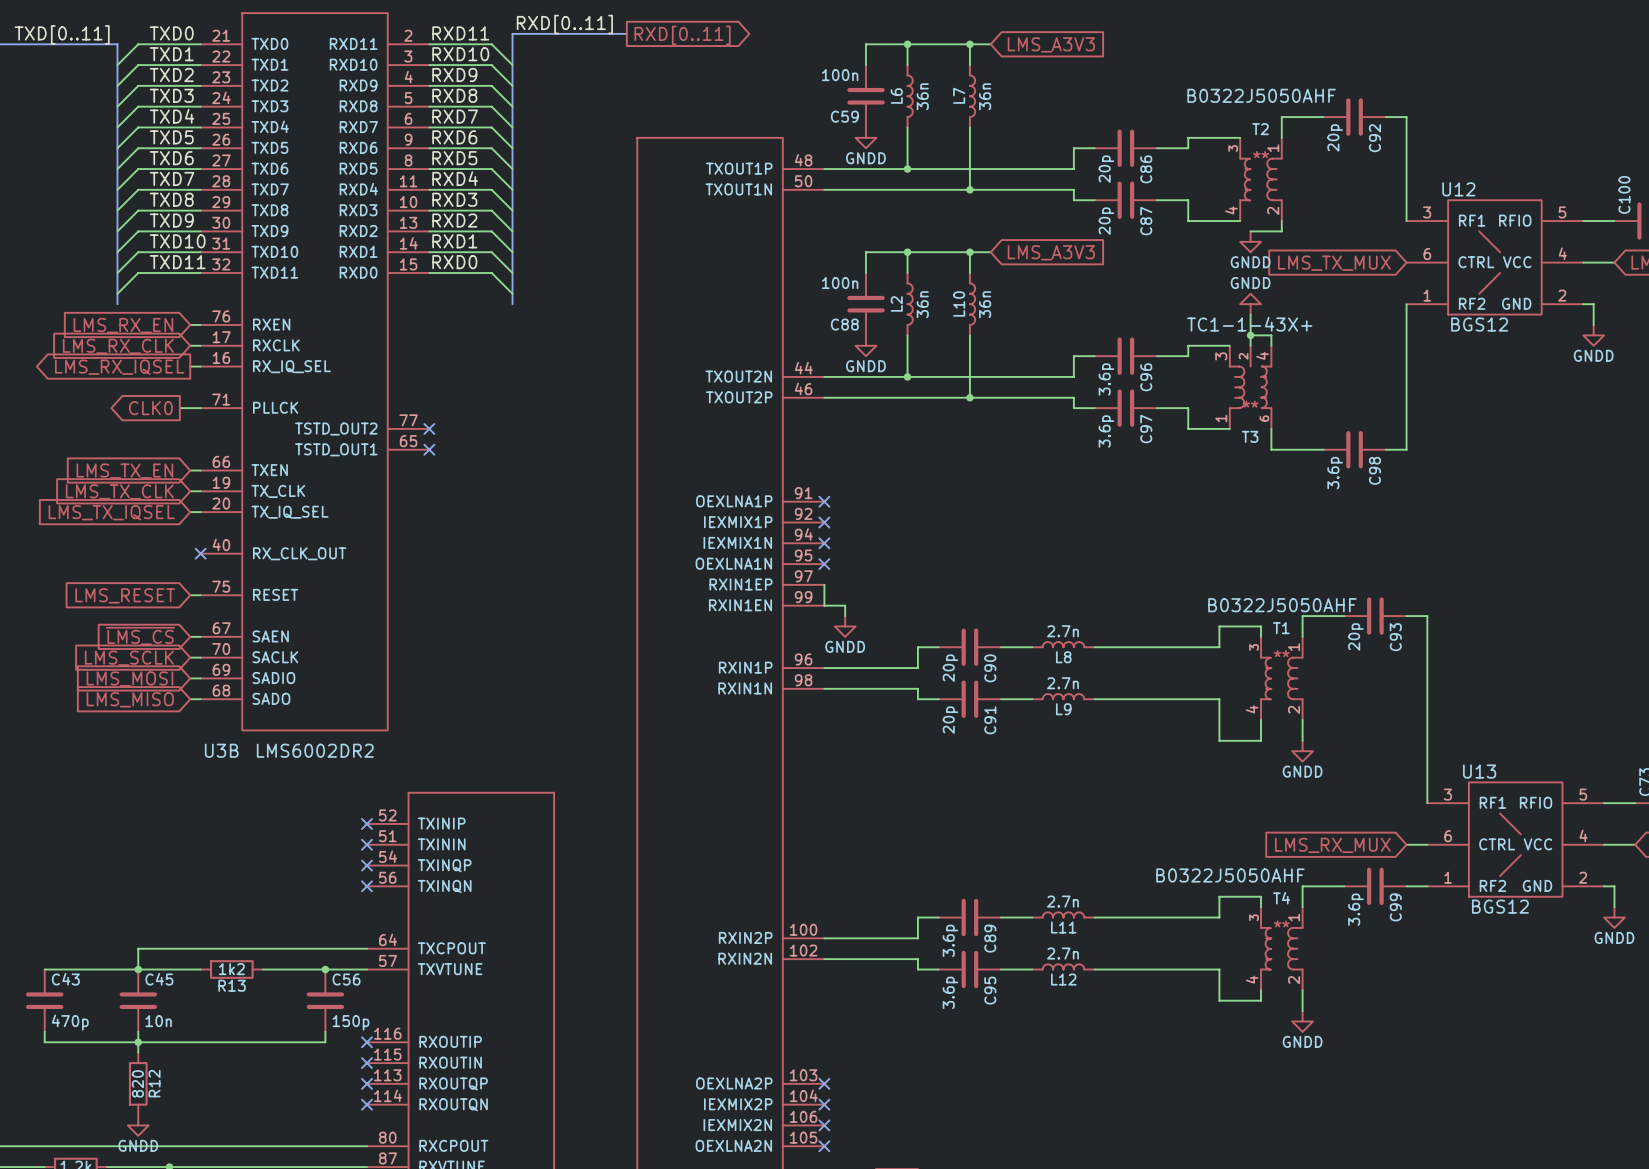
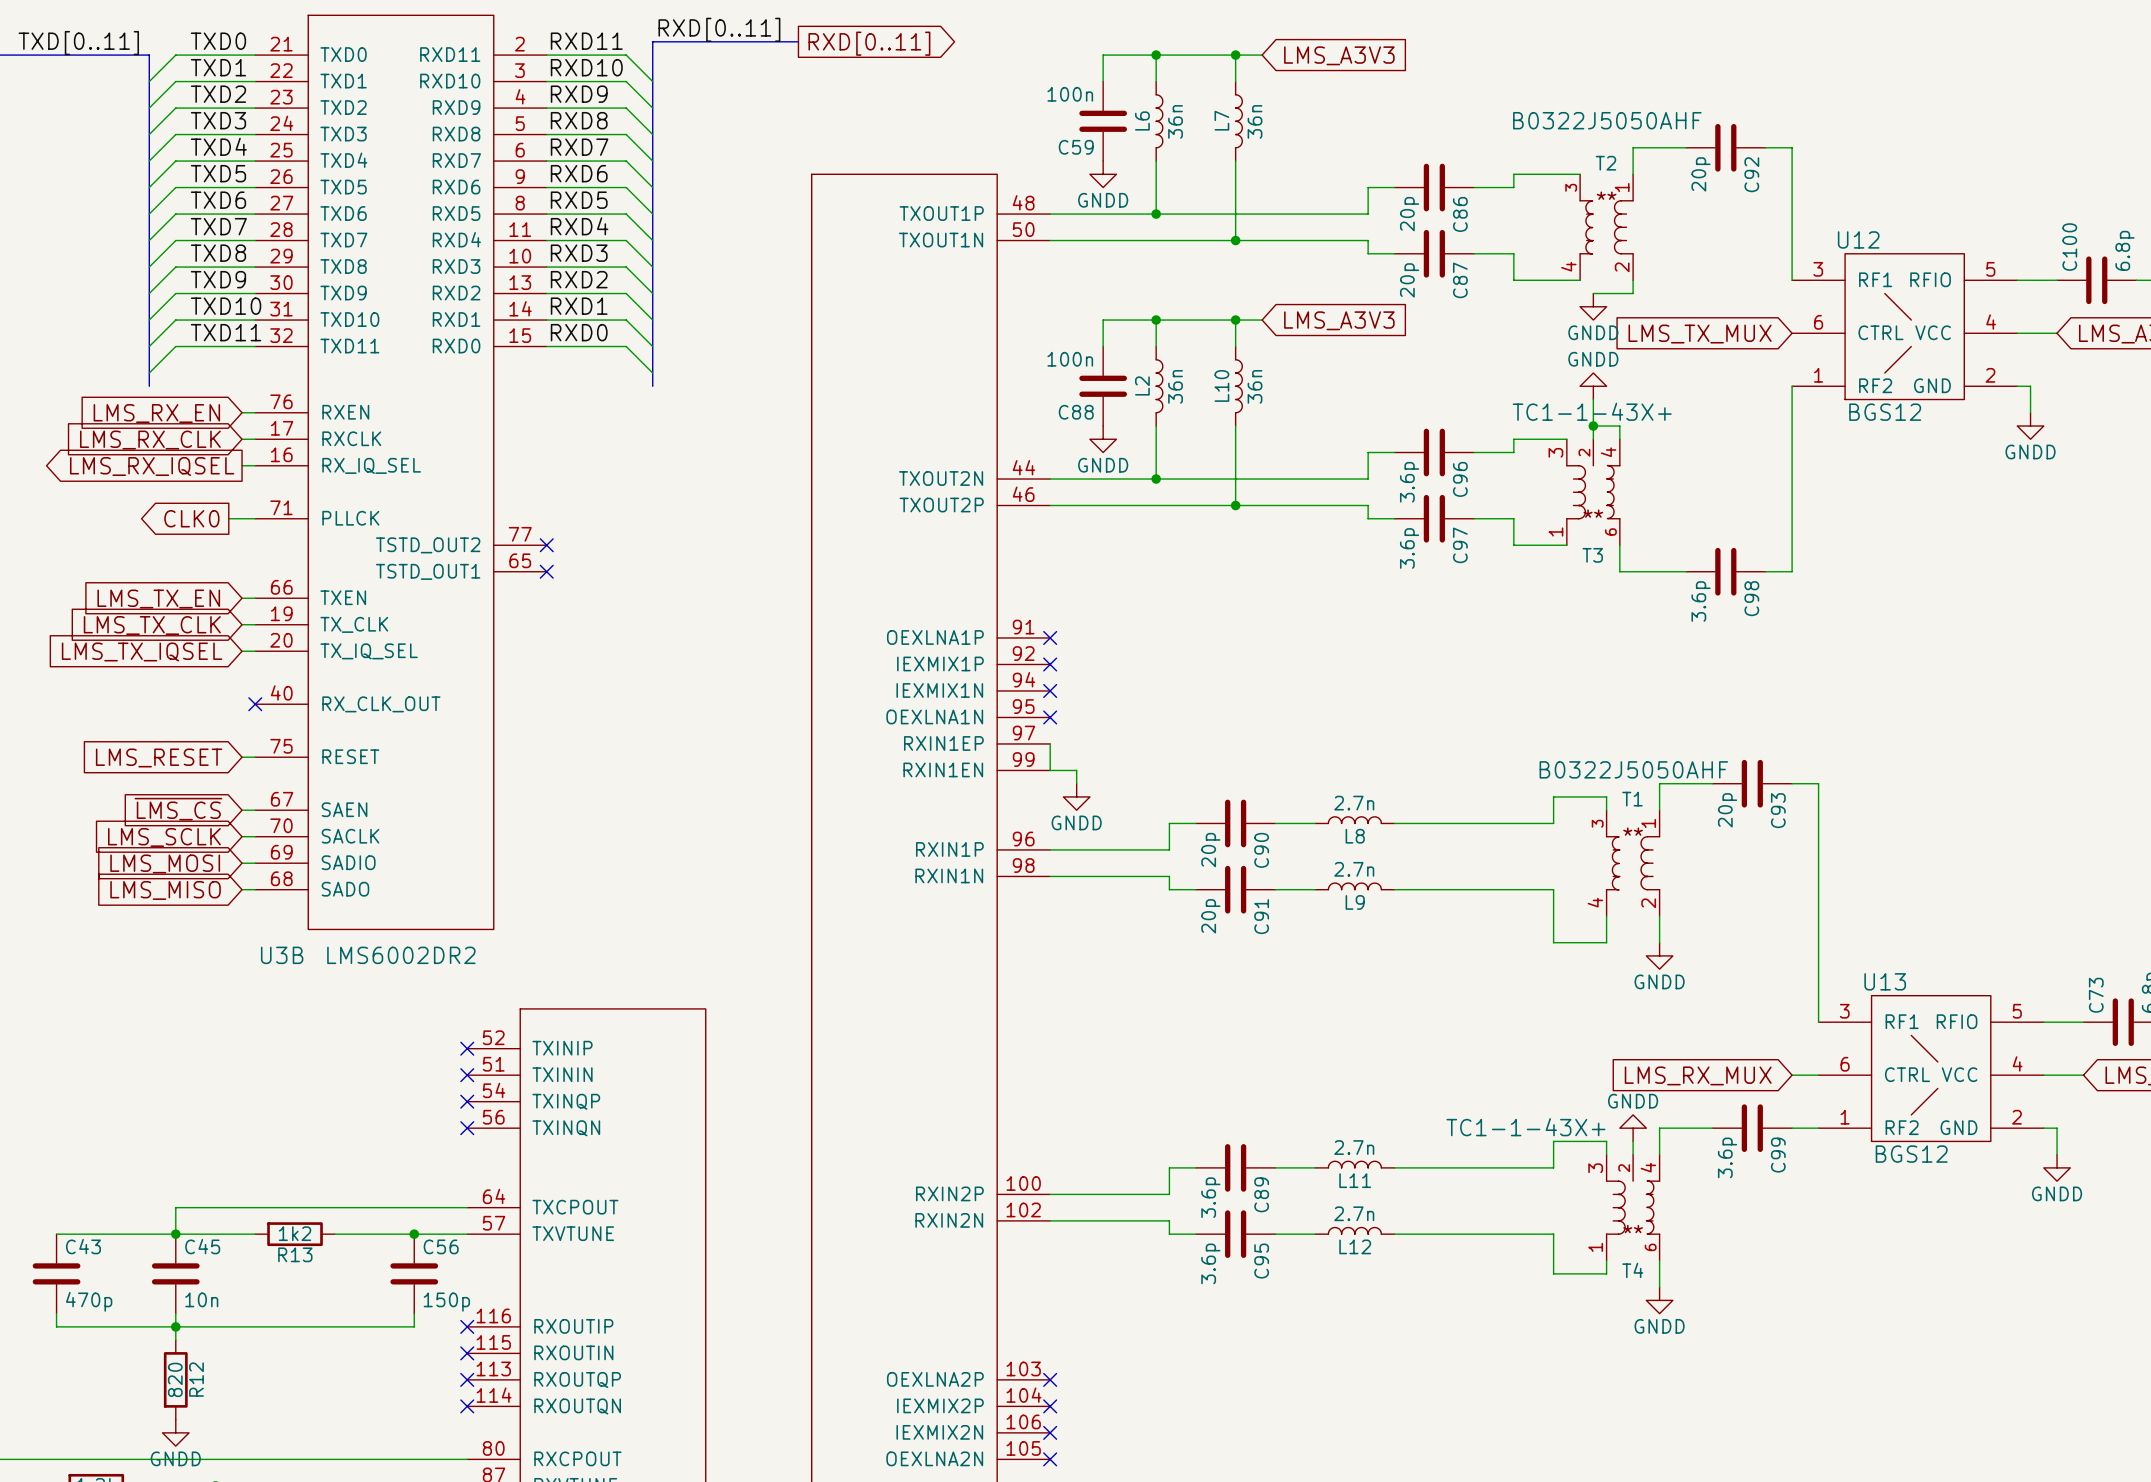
T4 text: B0322J5050AHF (1230, 875) -> none
T4 text: none -> TC1-1-43X+ (1525, 1127)
power symbol: none -> GNDD (1633, 1128)
wire: none -> (1633, 1141) (1633, 1154)
T4 name position: T4 (1281, 898) -> T4 (1632, 1270)
T4 symbol: [1261, 907, 1303, 991] -> [1606, 1154, 1660, 1261]

